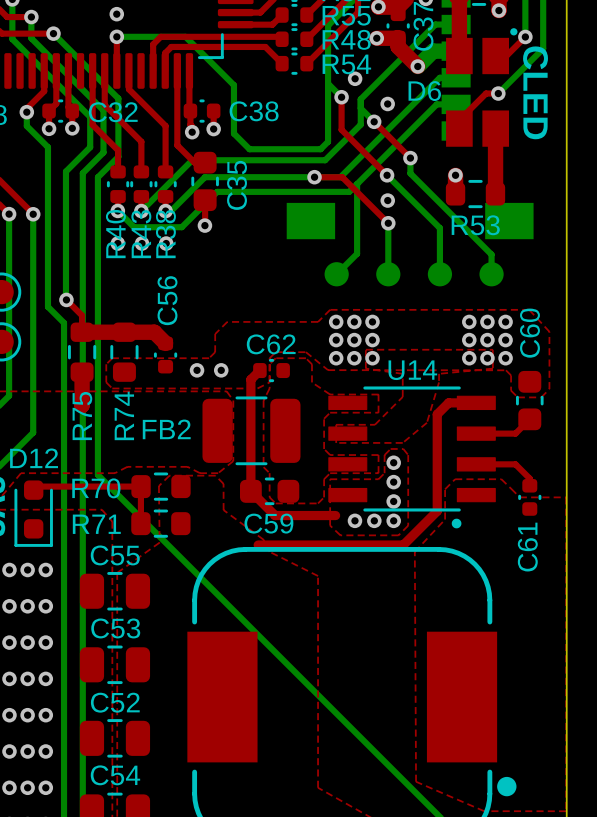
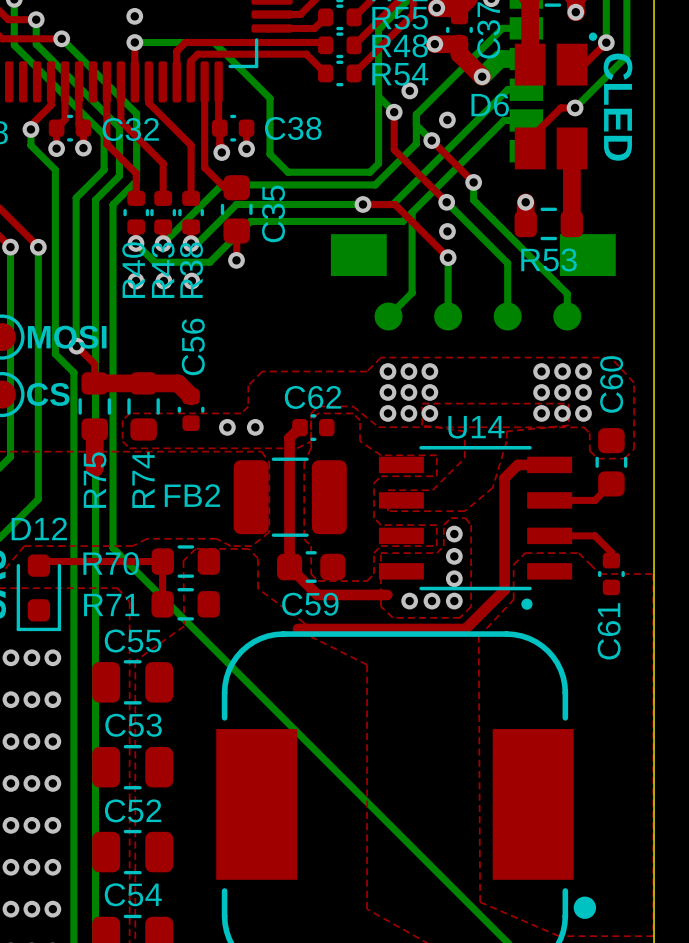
text: none -> MOSI (67, 337)
text: none -> CS (48, 394)

